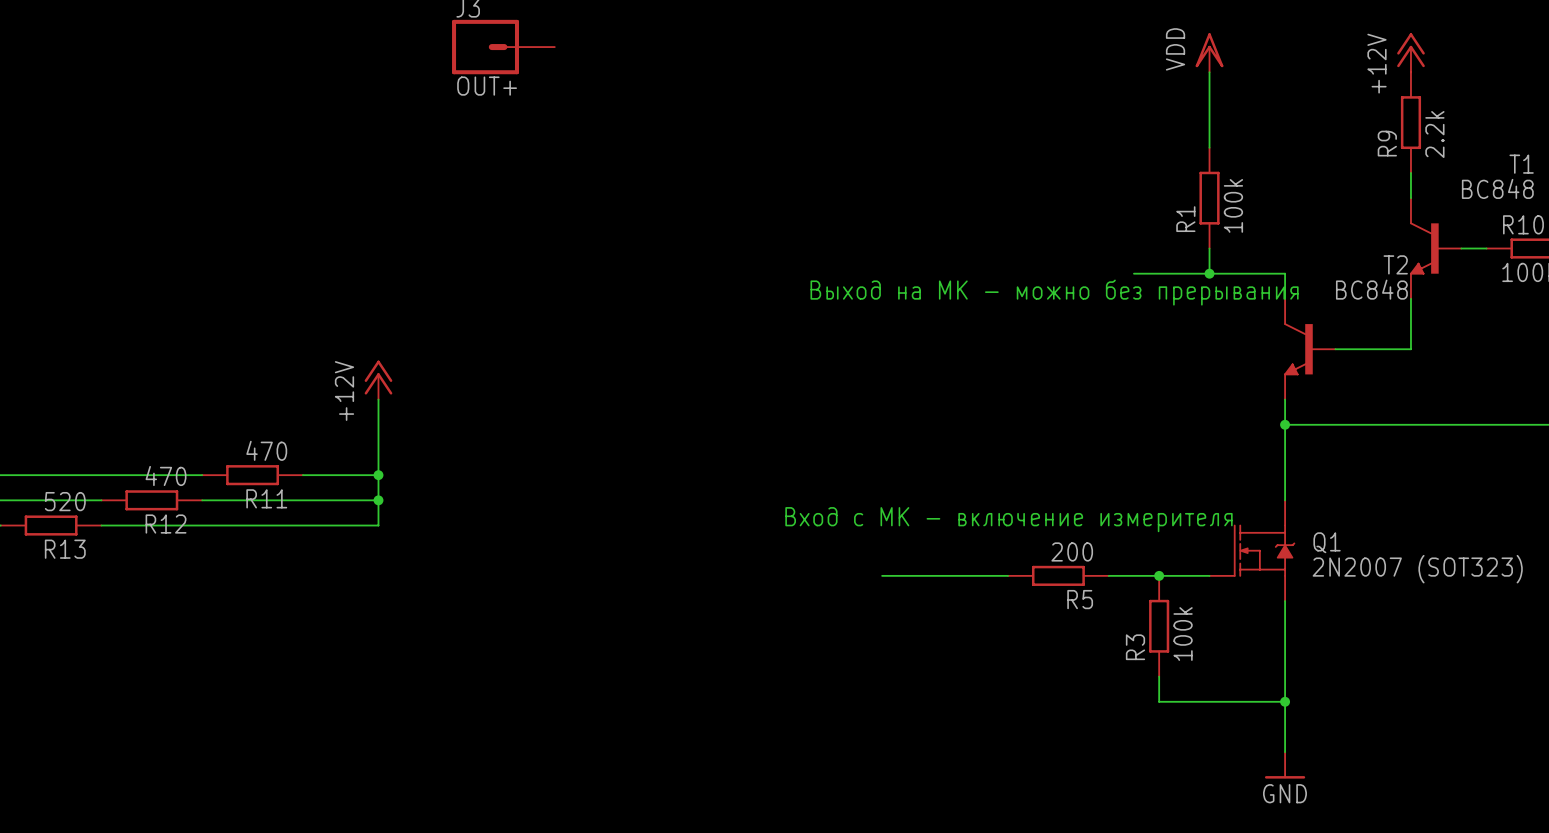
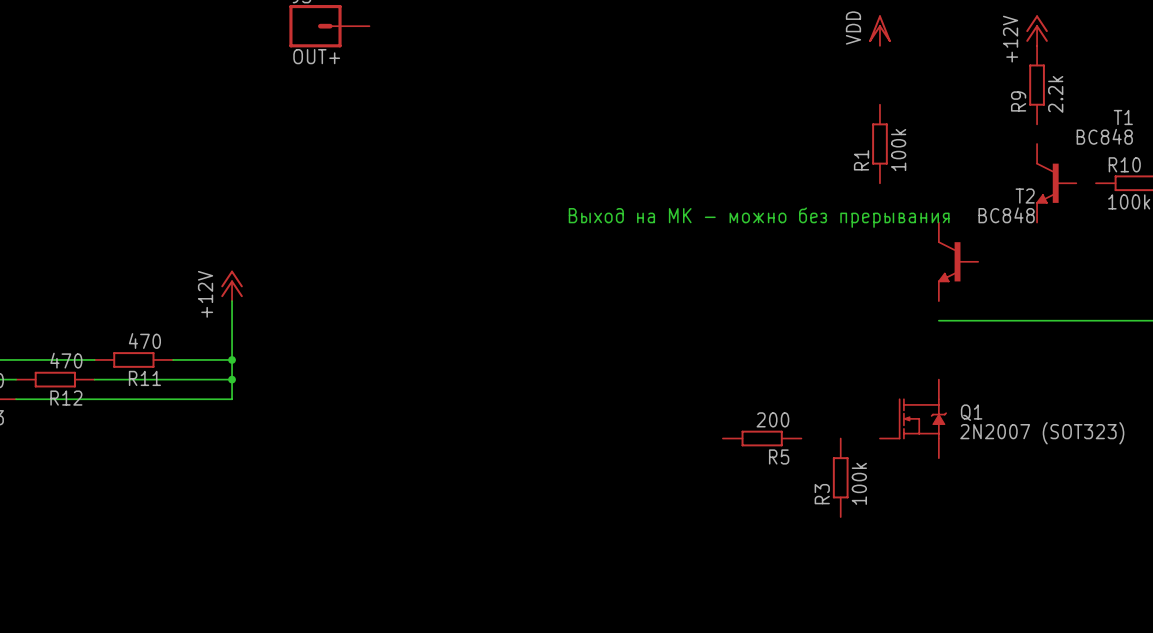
wire: (1209, 72) (1209, 147) -> none
wire: (1410, 172) (1410, 198) -> none
wire: (1209, 248) (1209, 273) -> none
wire: (1461, 248) (1486, 248) -> none
wire: (1133, 273) (1285, 273) (1285, 298) -> none
junction: (1209, 273) -> none
wire: (1410, 298) (1410, 349) (1335, 349) -> none
wire: (1285, 399) (1285, 500) -> none
junction: (1285, 424) -> none
text: Вход с МК - включение измерителя (1008, 519) -> none
wire: (882, 575) (1008, 575) -> none
wire: (1108, 575) (1209, 575) -> none
junction: (1159, 575) -> none
wire: (1285, 601) (1285, 752) -> none
wire: (1159, 676) (1159, 701) (1285, 701) -> none
junction: (1285, 701) -> none
power symbol: GND (1285, 765) -> none

